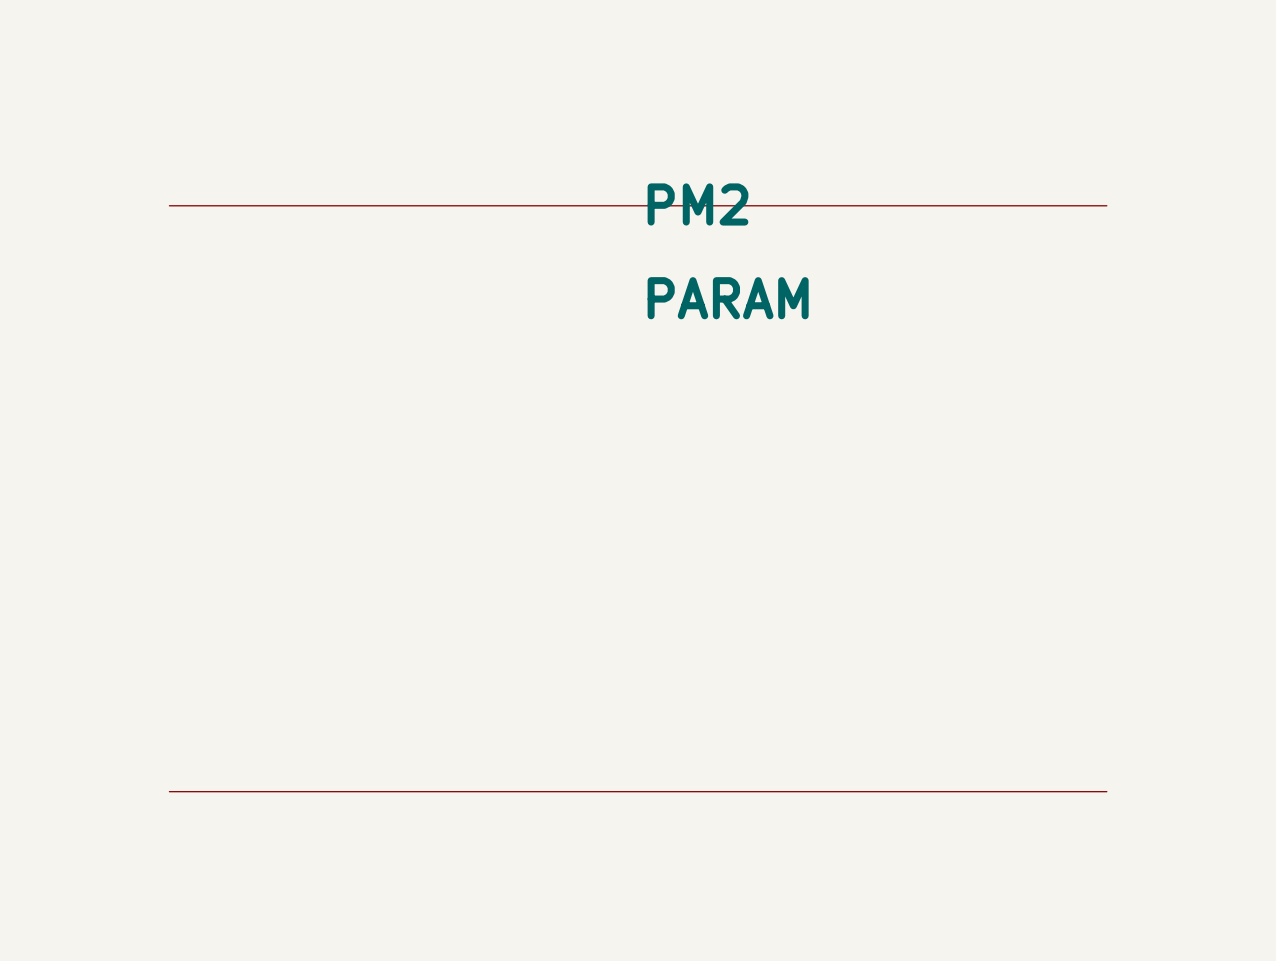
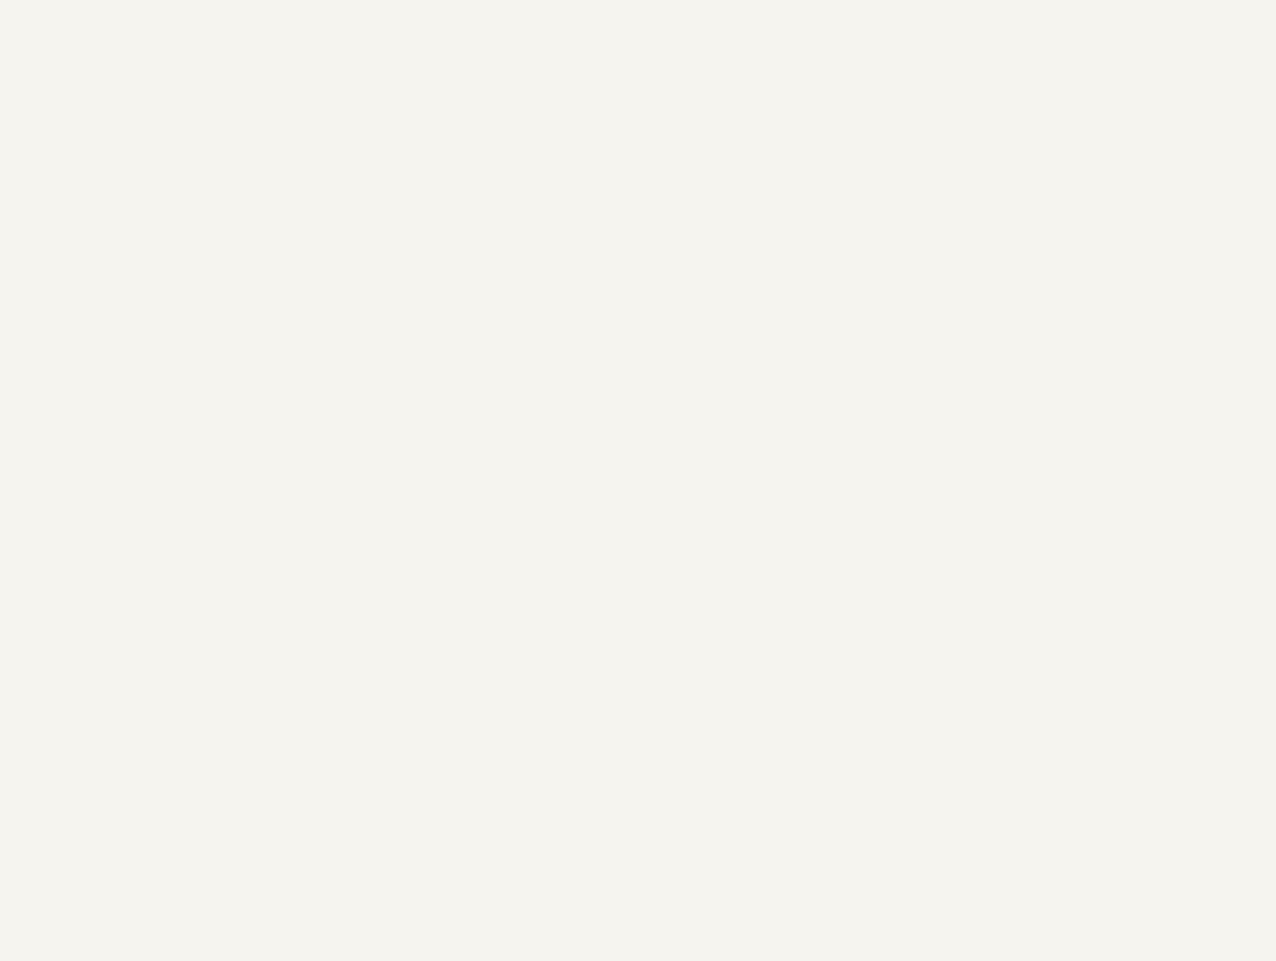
PM2: PARAM (638, 205) -> none
part: (638, 791) -> none

